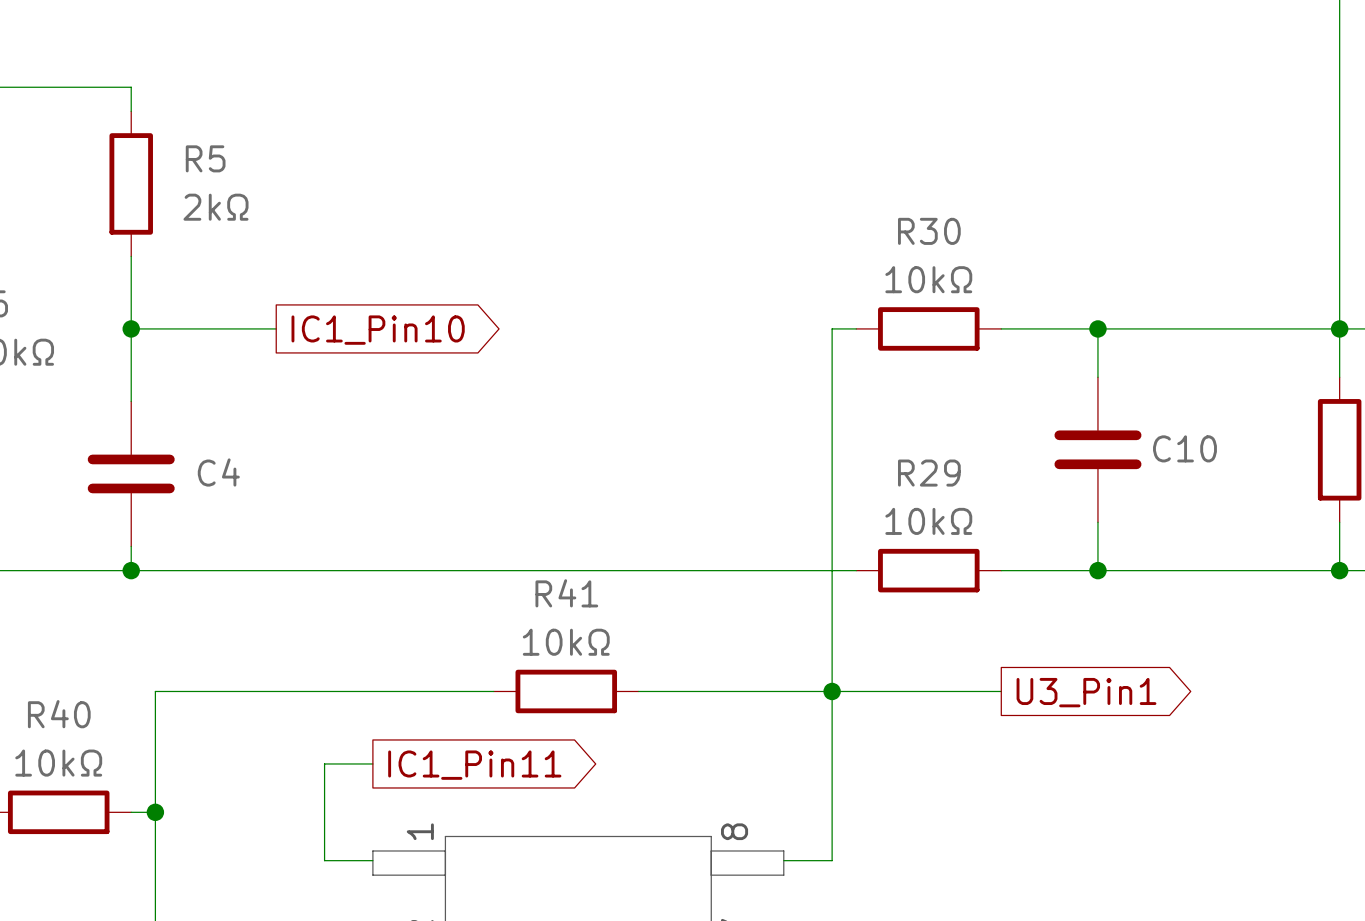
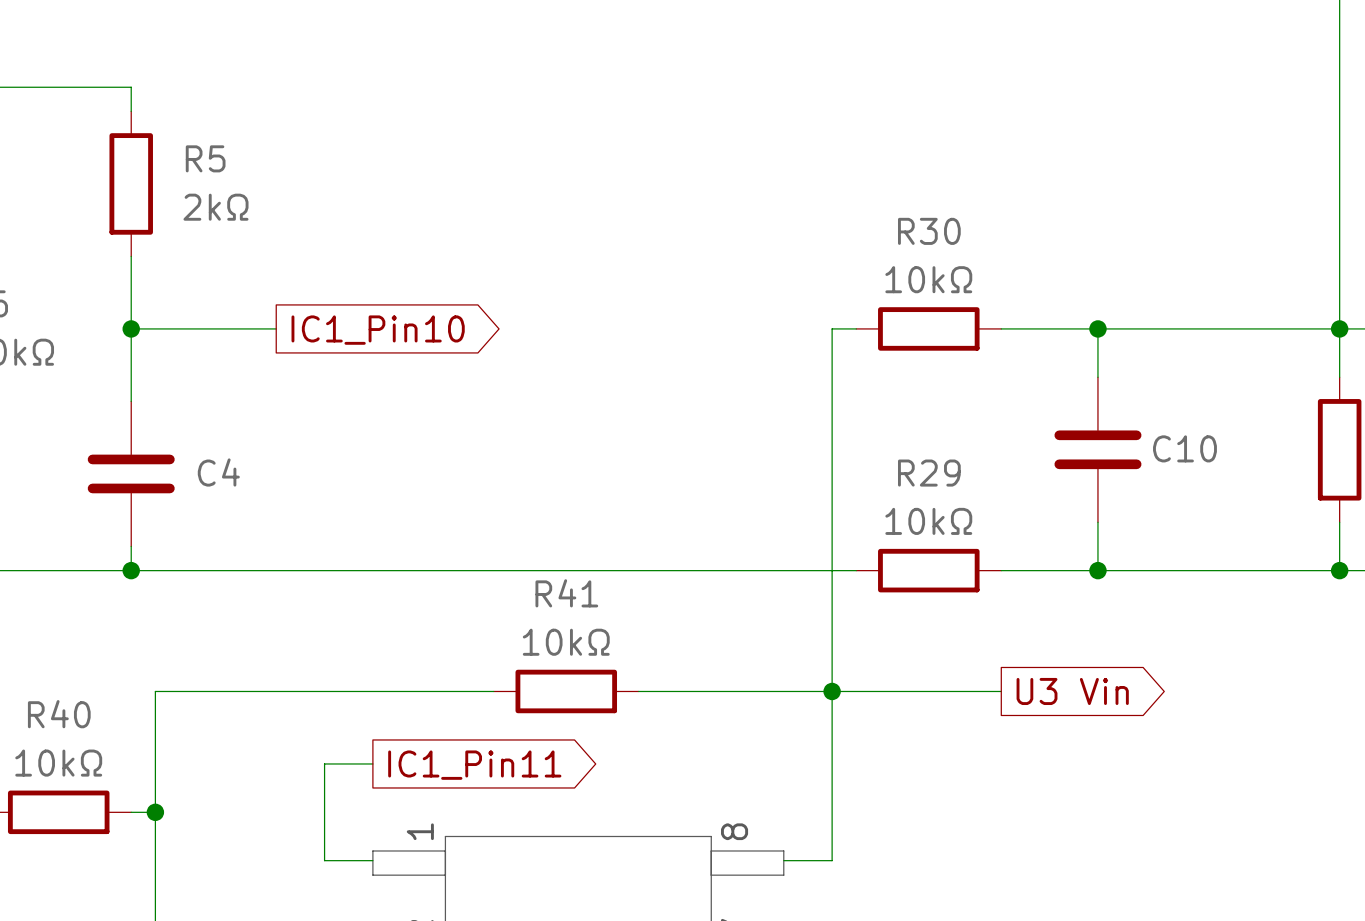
global label: U3_Pin1 (1086, 692) -> U3 Vin (1072, 691)

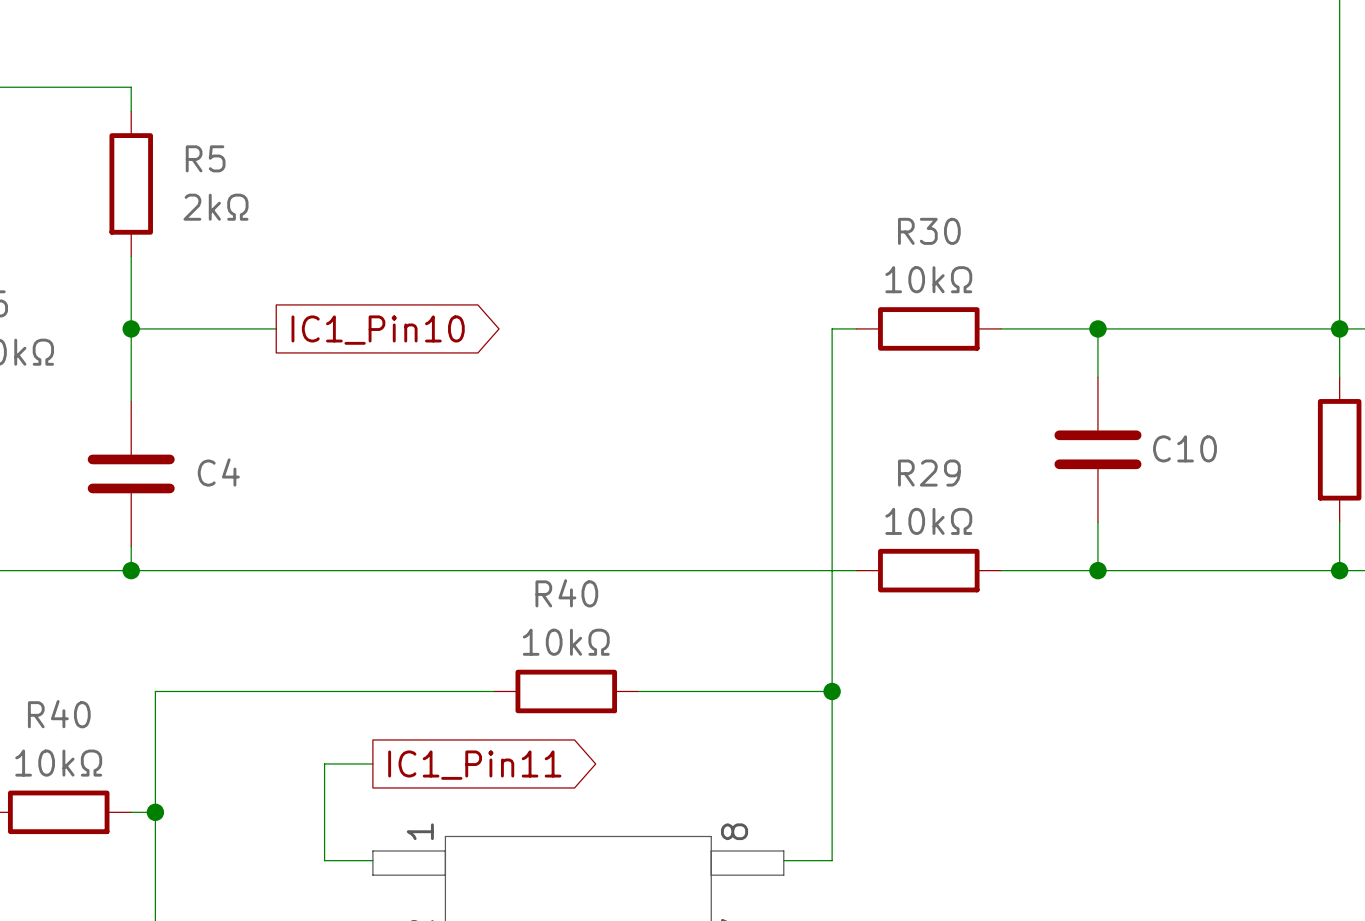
R41 name: R41 (566, 593) -> R40 (566, 593)
wire: (832, 691) (1001, 691) -> none
global label: U3 Vin (1072, 691) -> none

